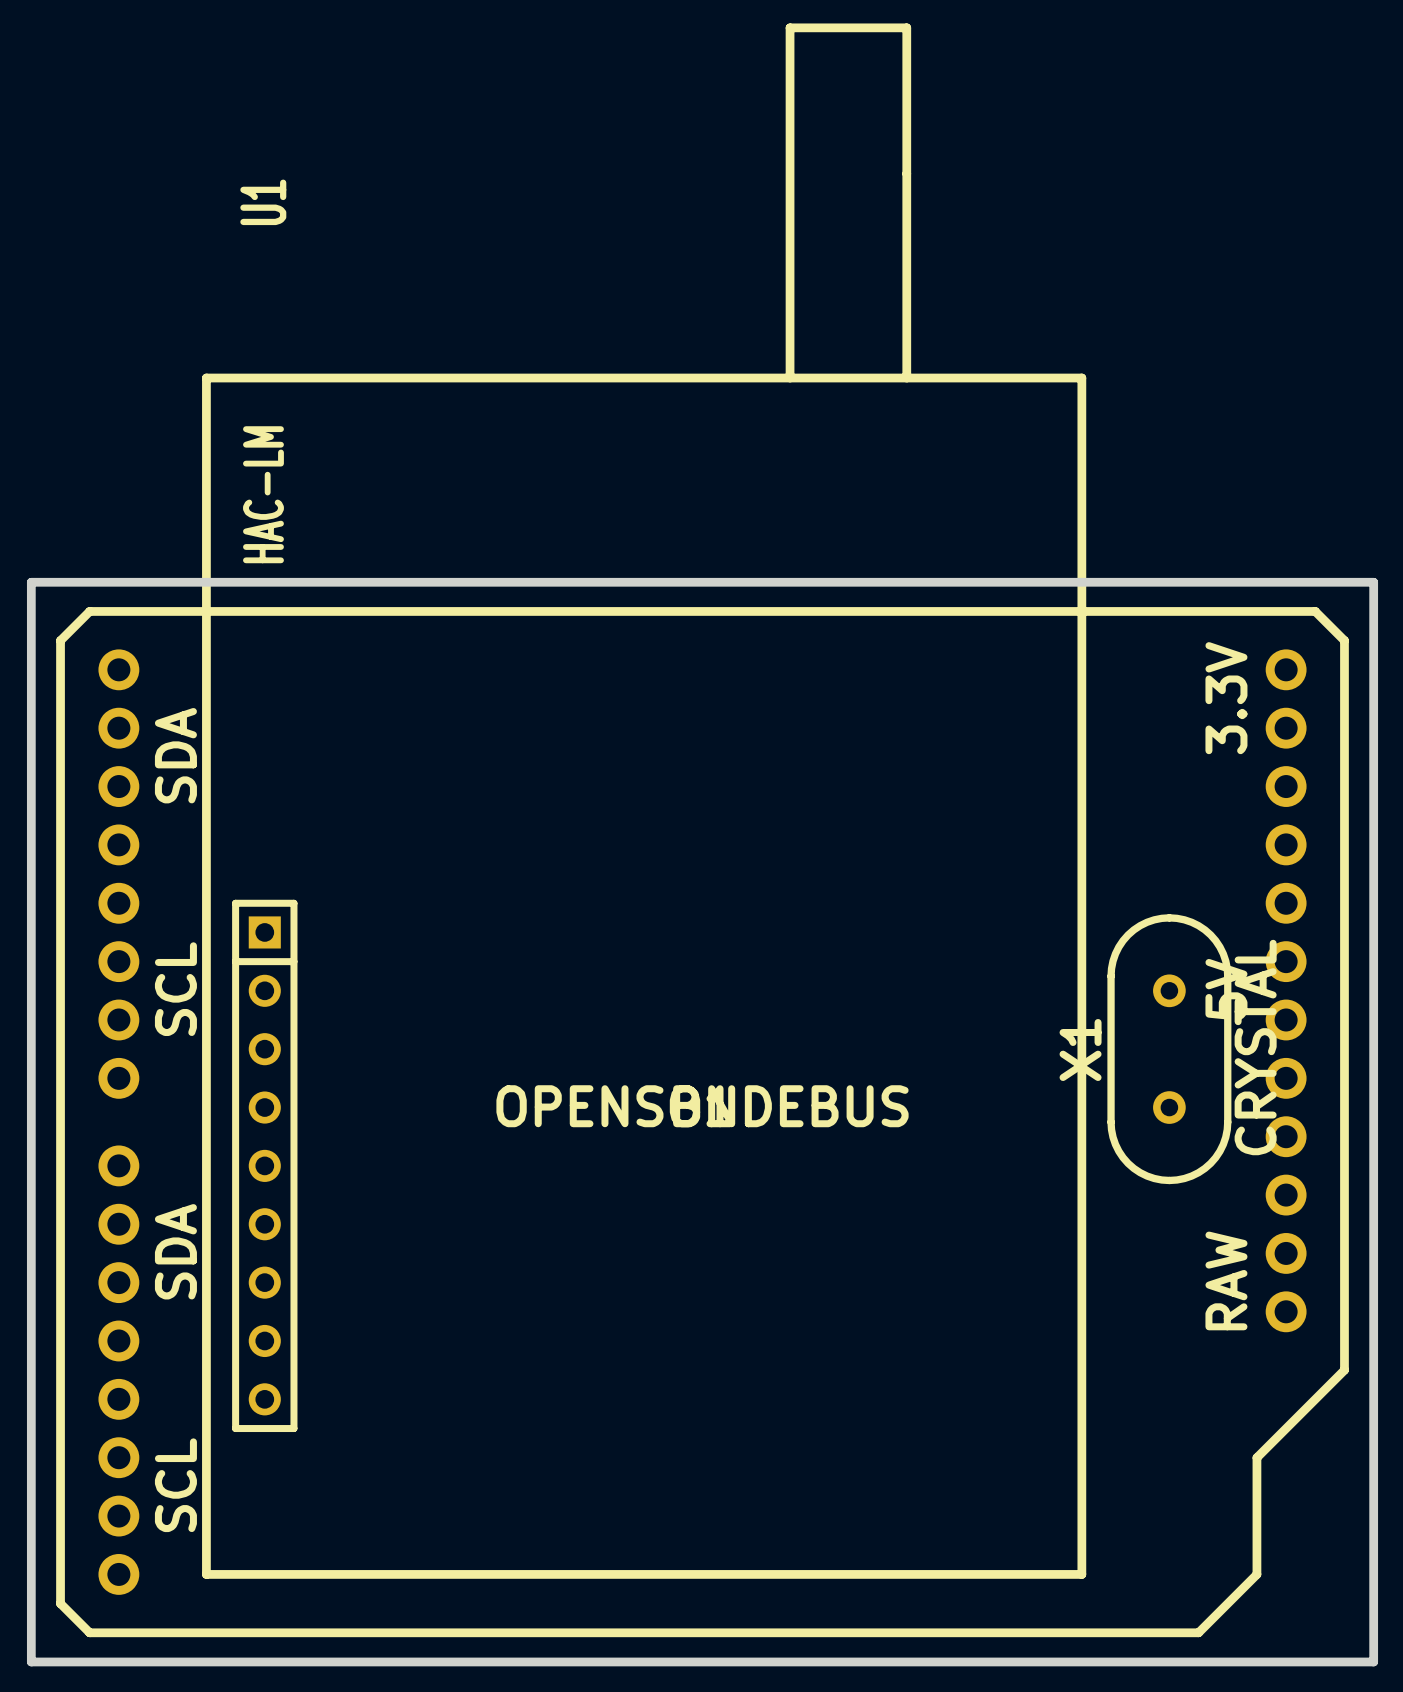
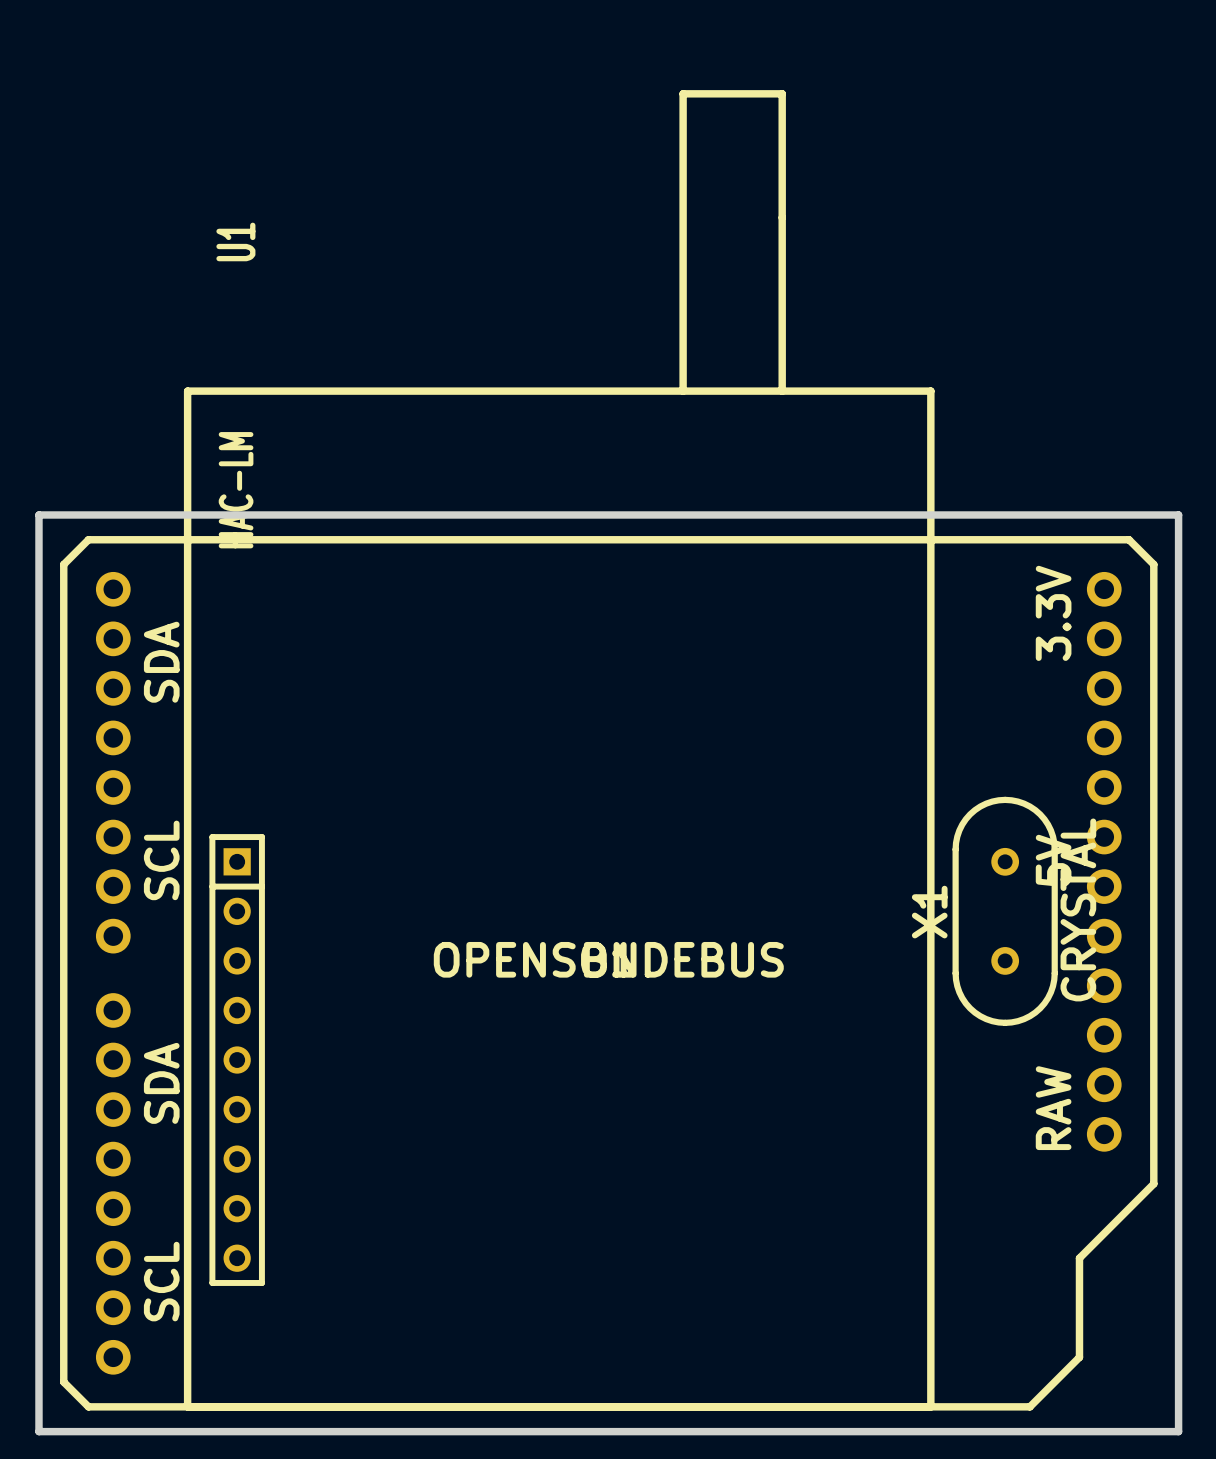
U1 position: (644, 801) -> (559, 750)

